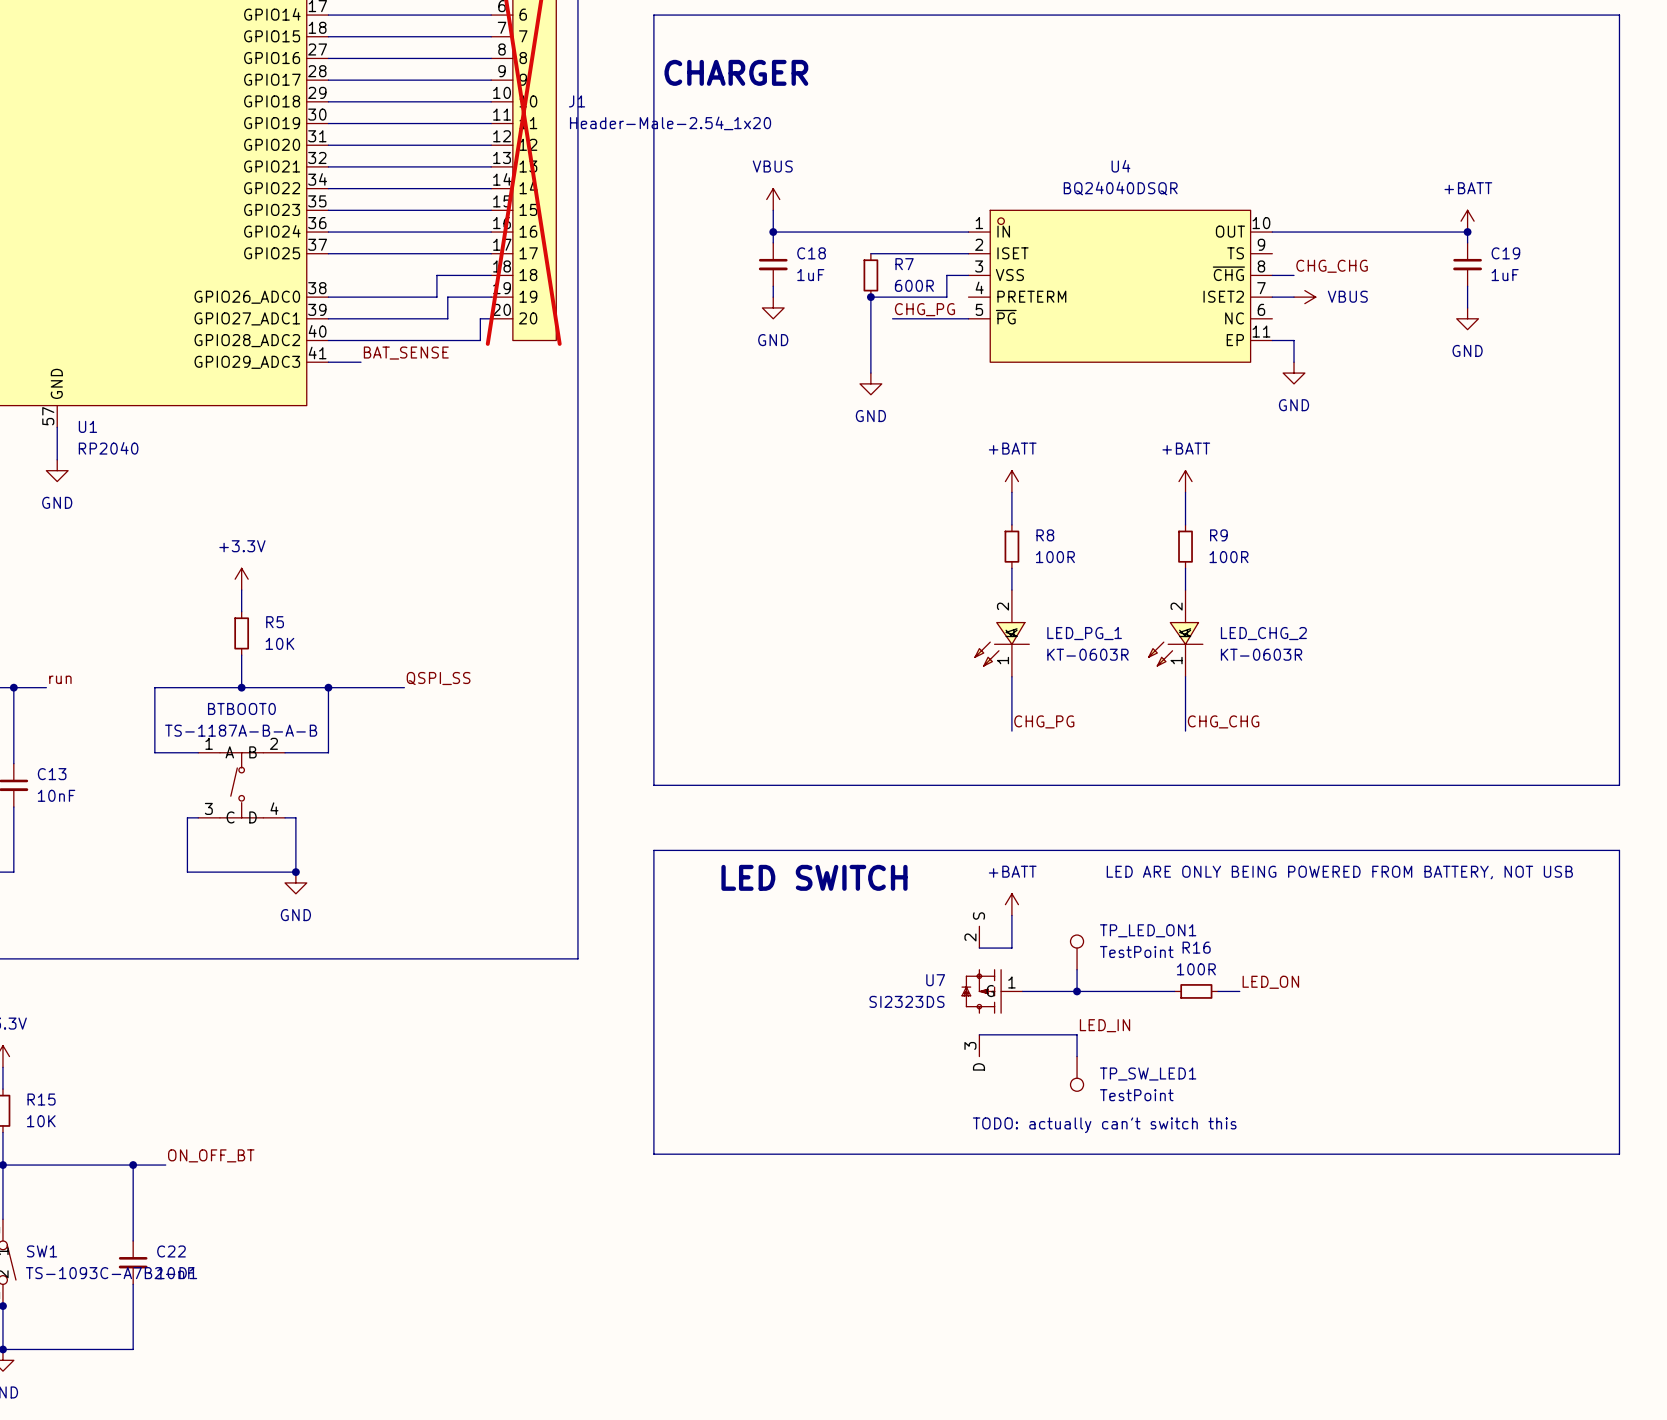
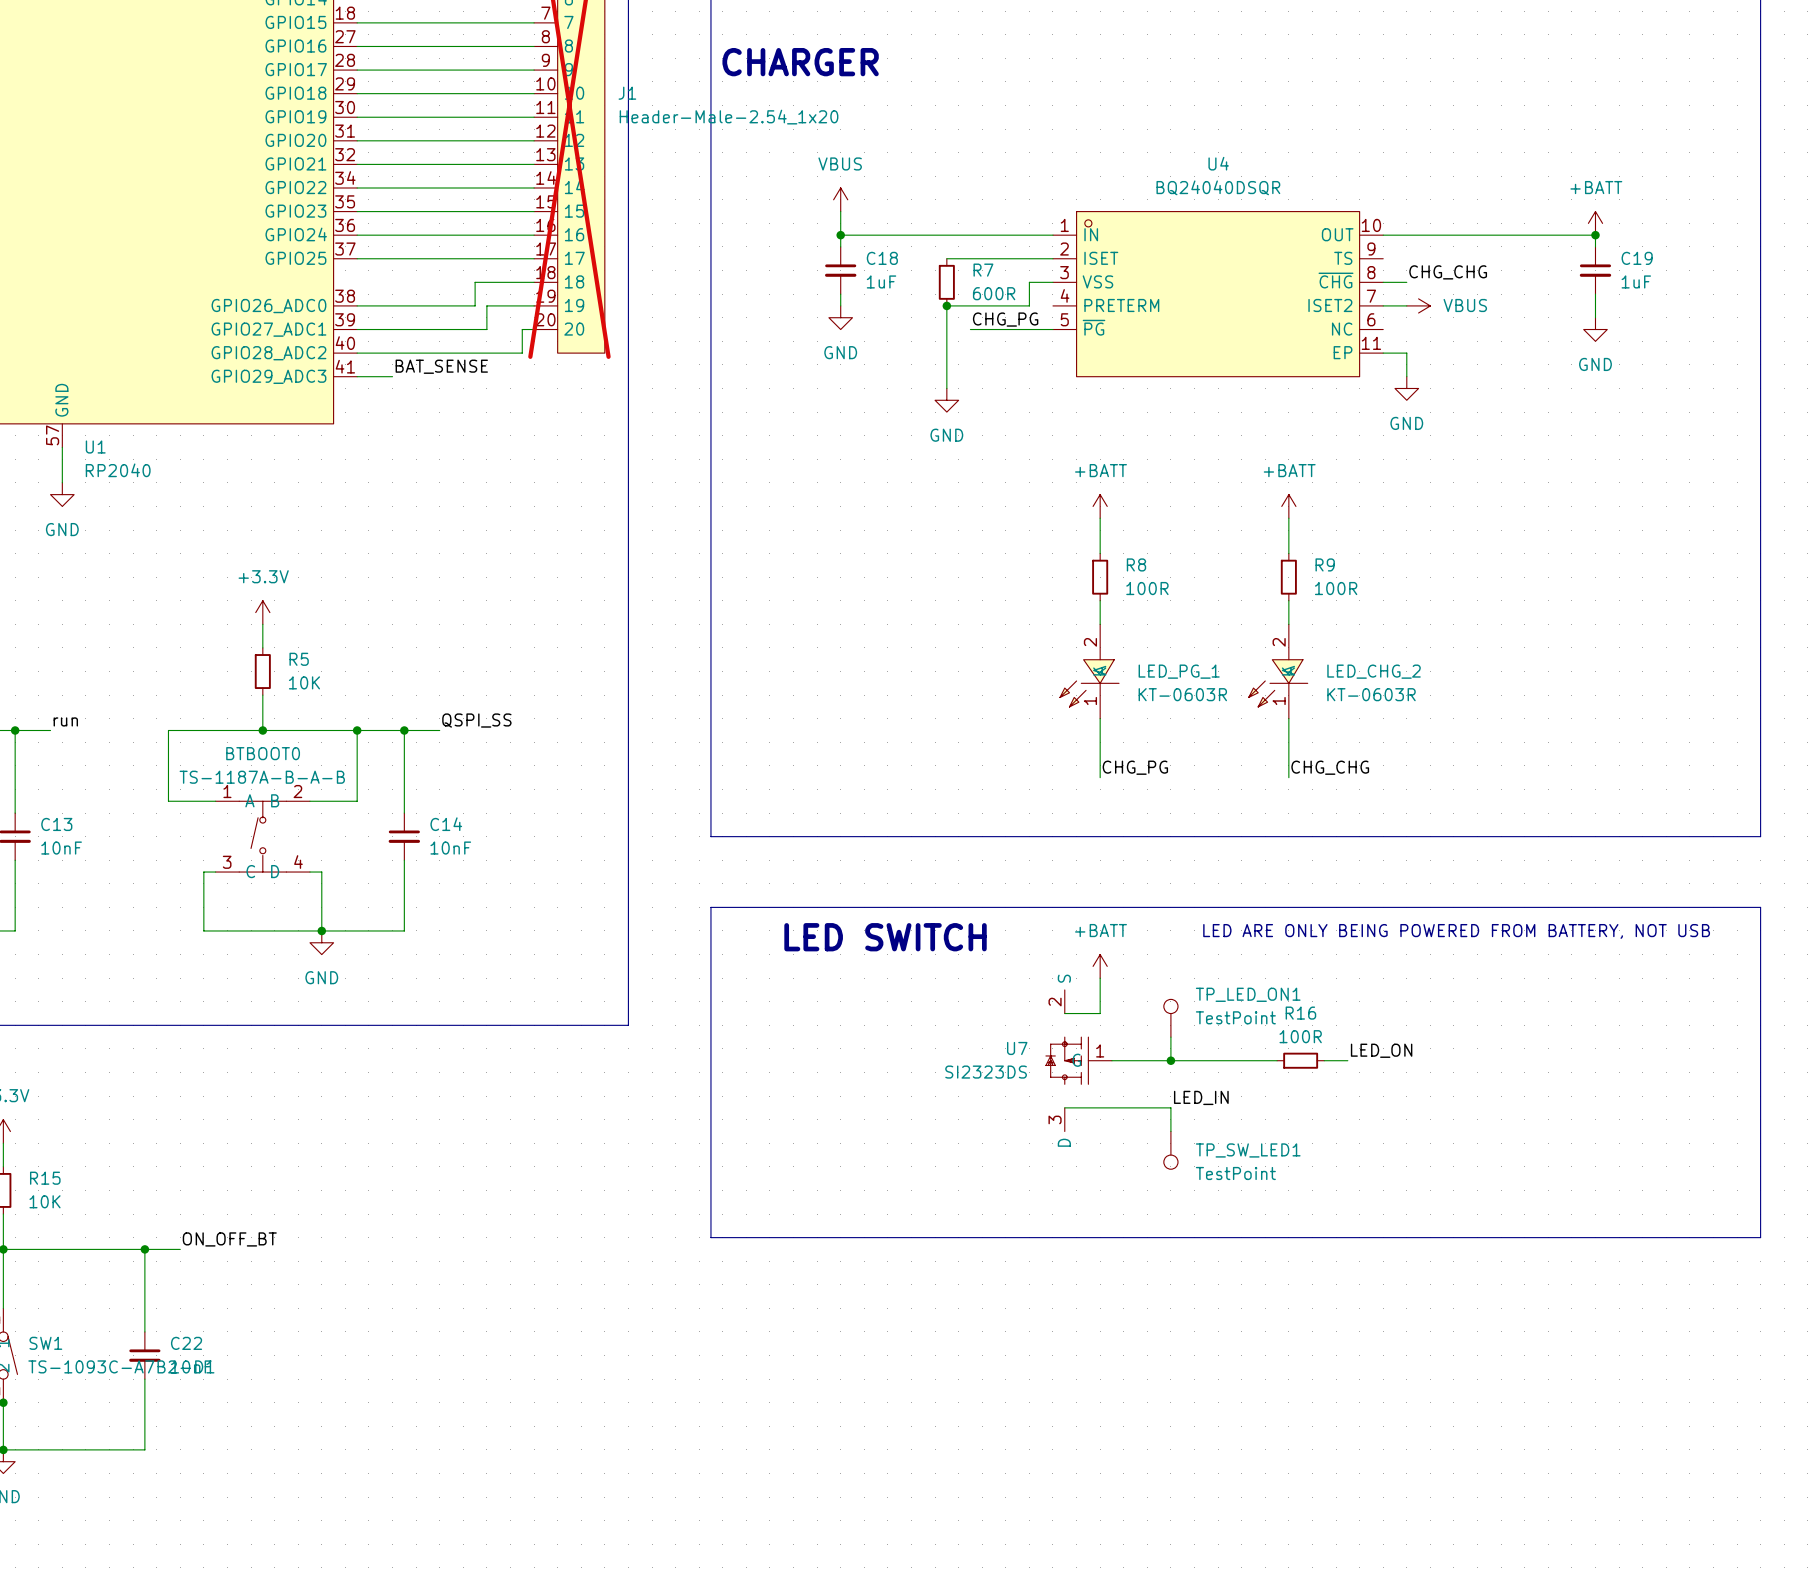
wire: none -> (404, 730) (404, 813)
junction: none -> (404, 730)
C14: none -> 10nF (404, 836)
wire: none -> (404, 860) (404, 930) (321, 930)
text: TODO: actually can't switch this (1104, 1125) -> none

